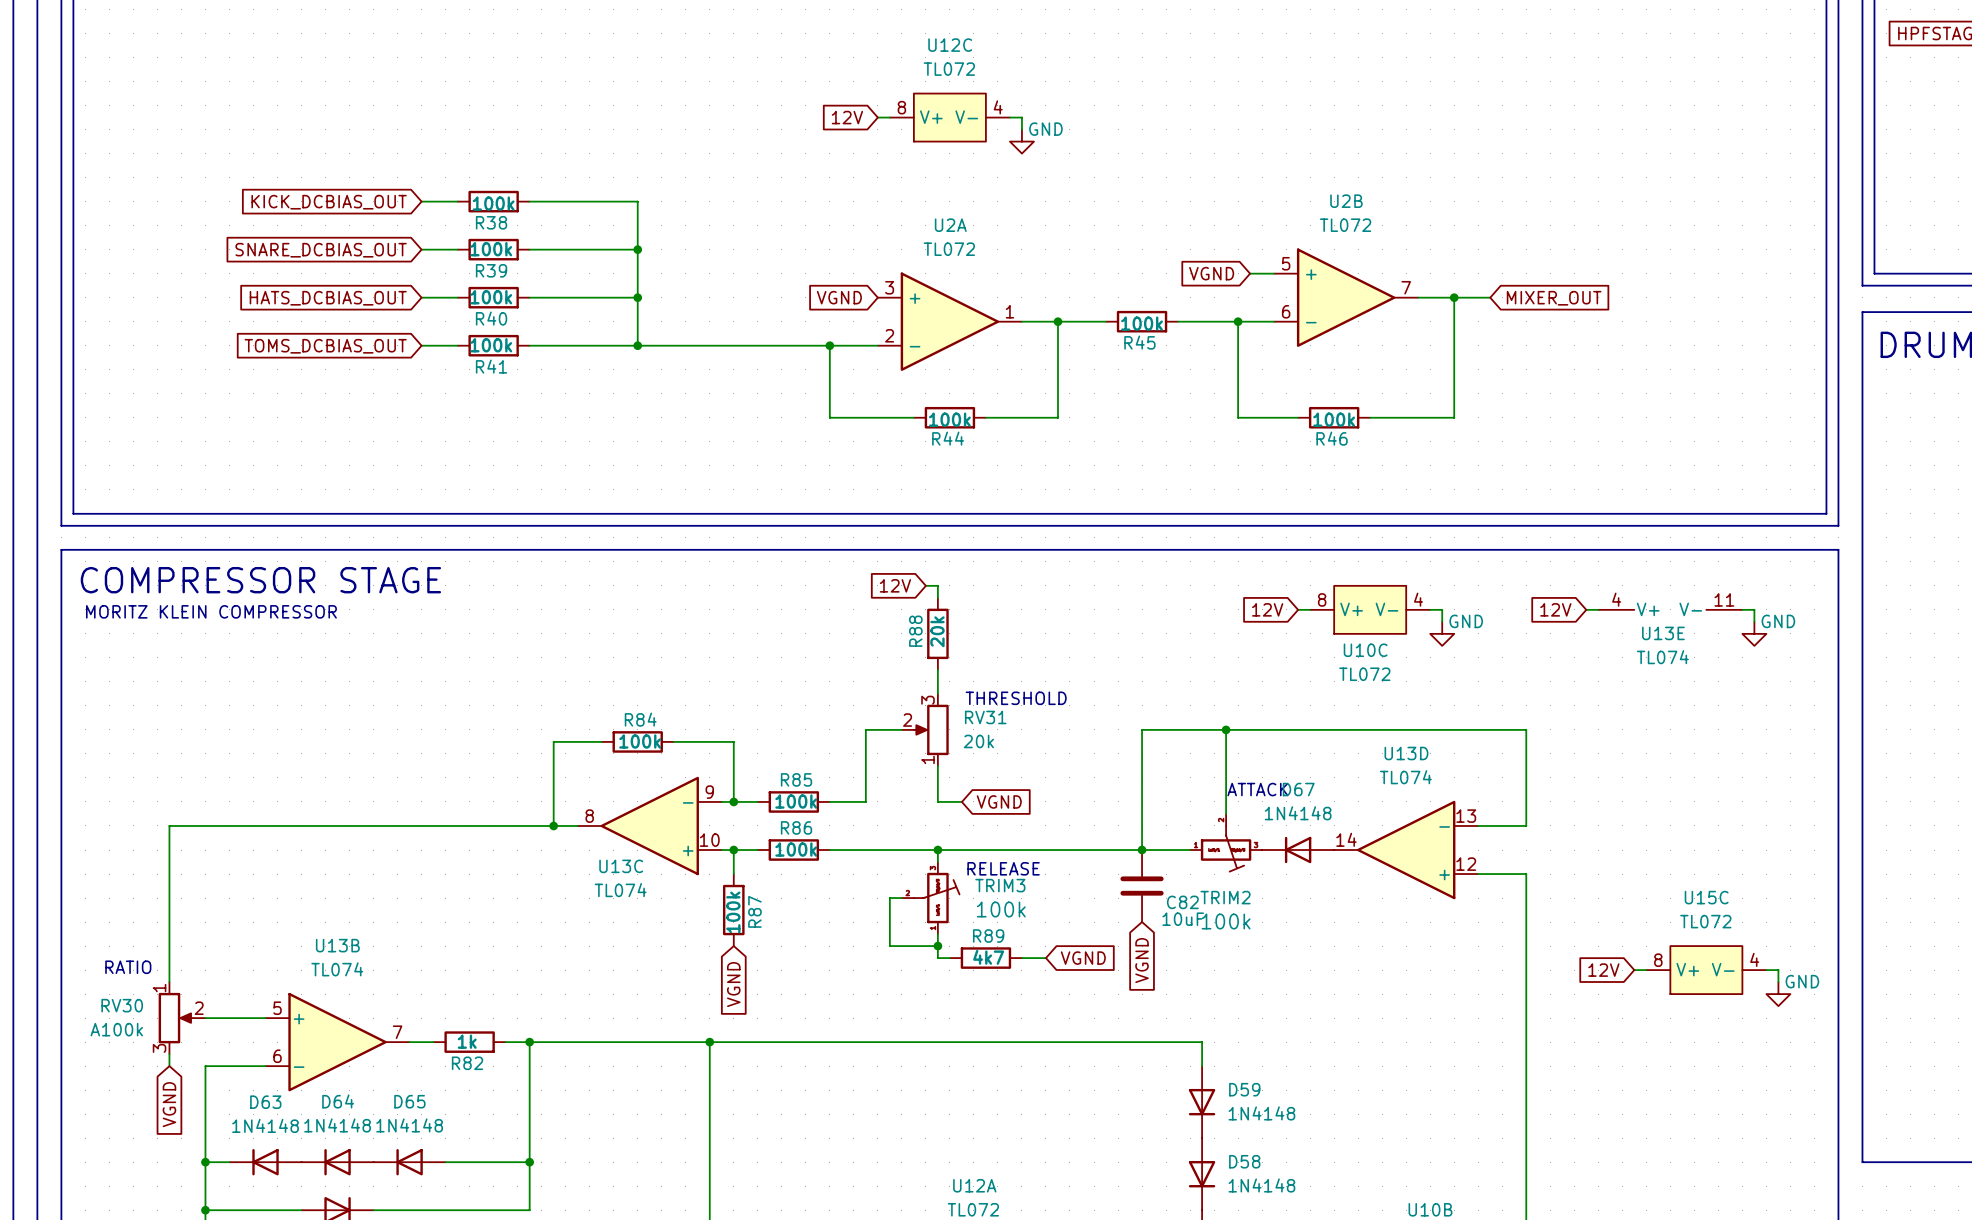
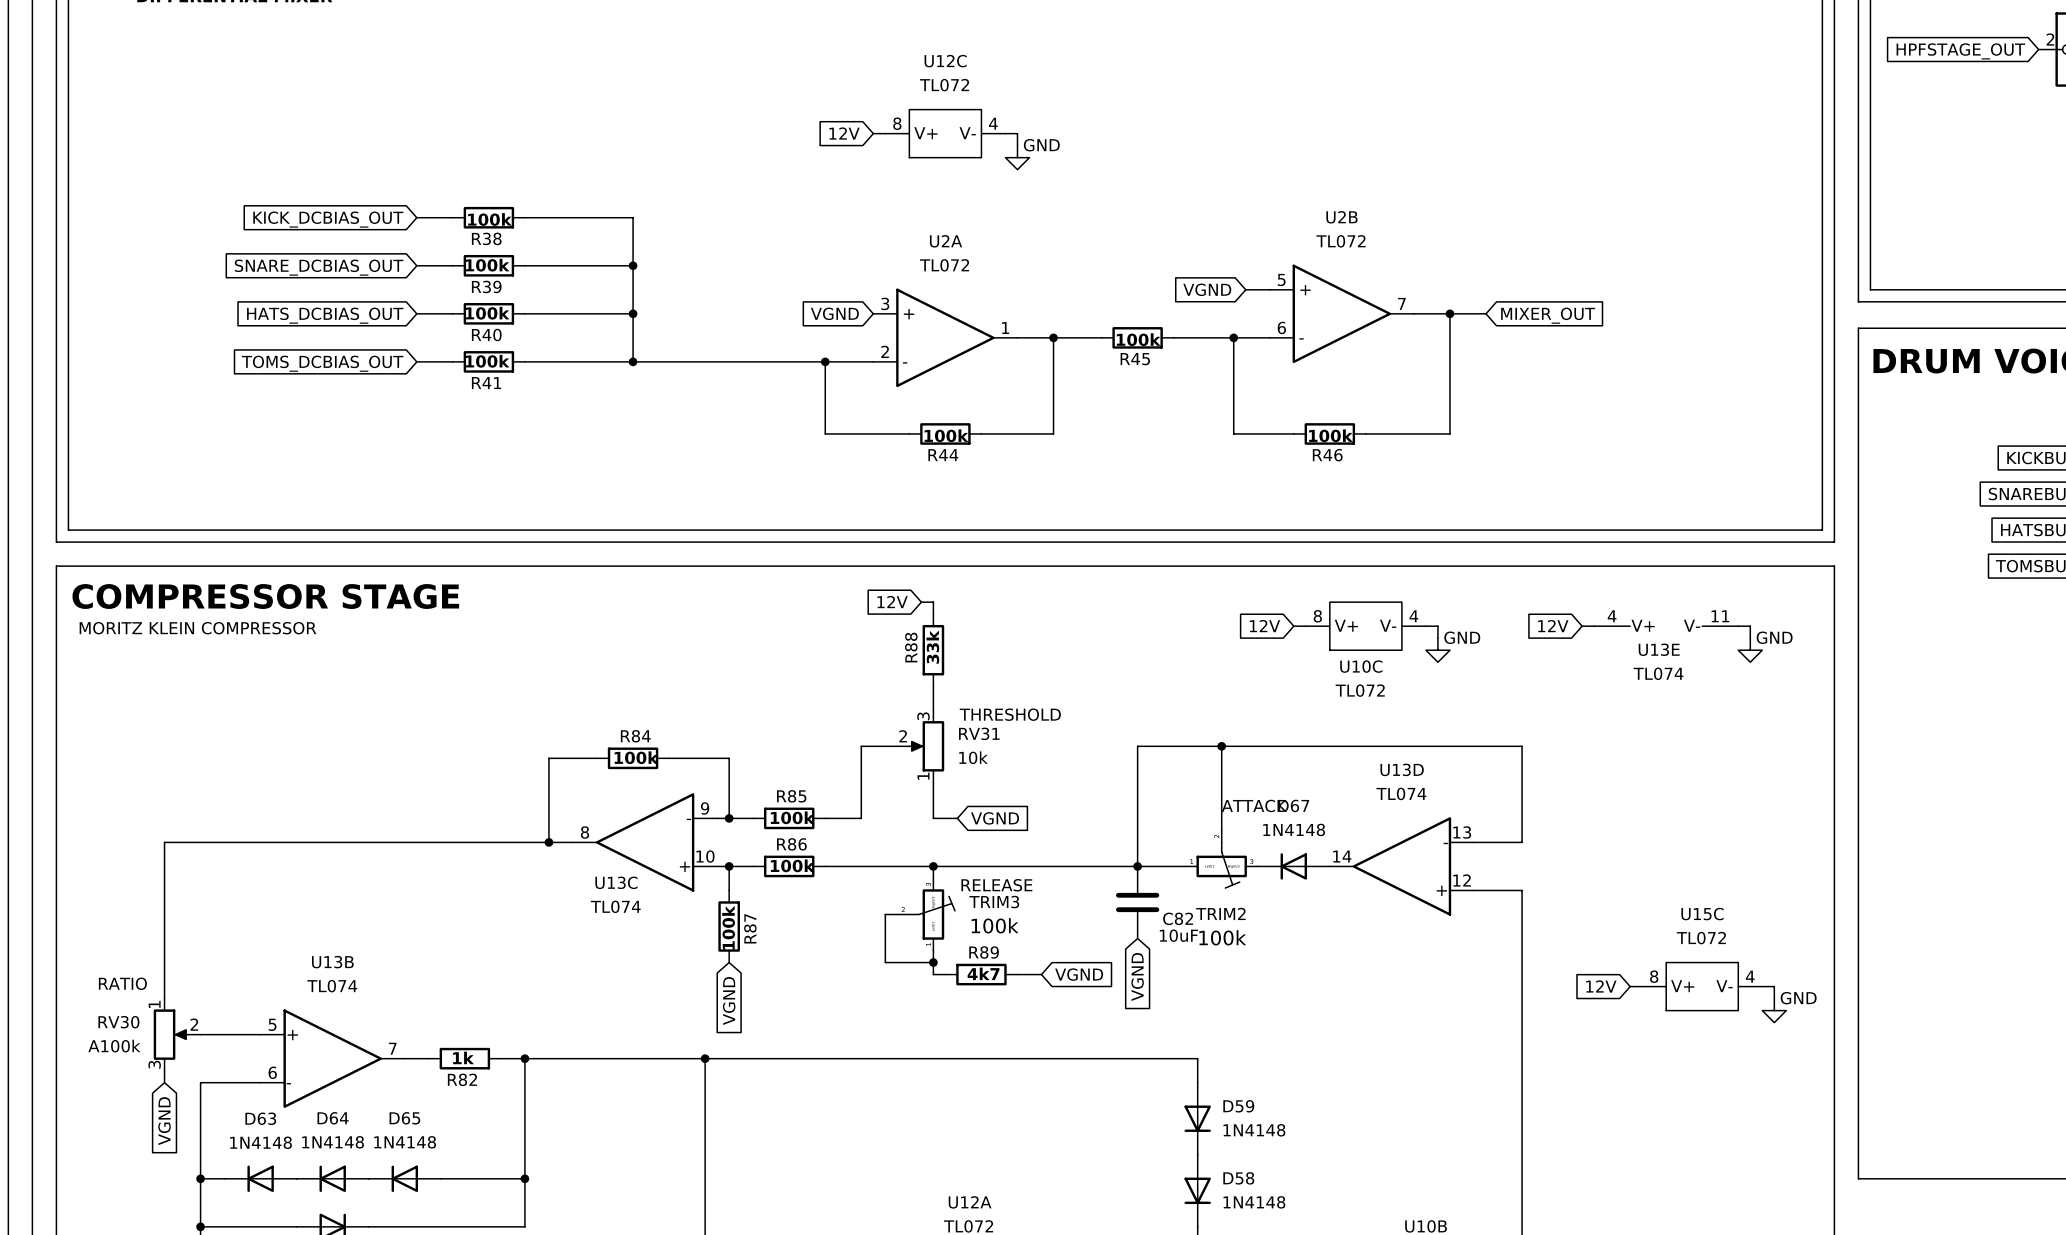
R88 value: 20k (937, 631) -> 33k (932, 647)
RV31 value: 20k (978, 741) -> 10k (973, 757)

